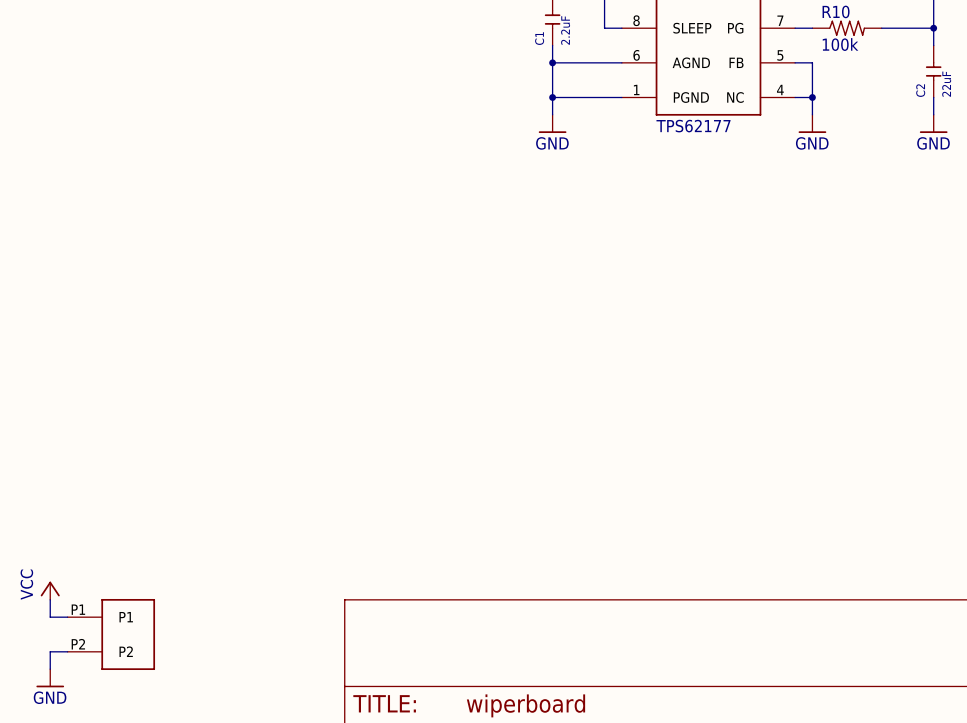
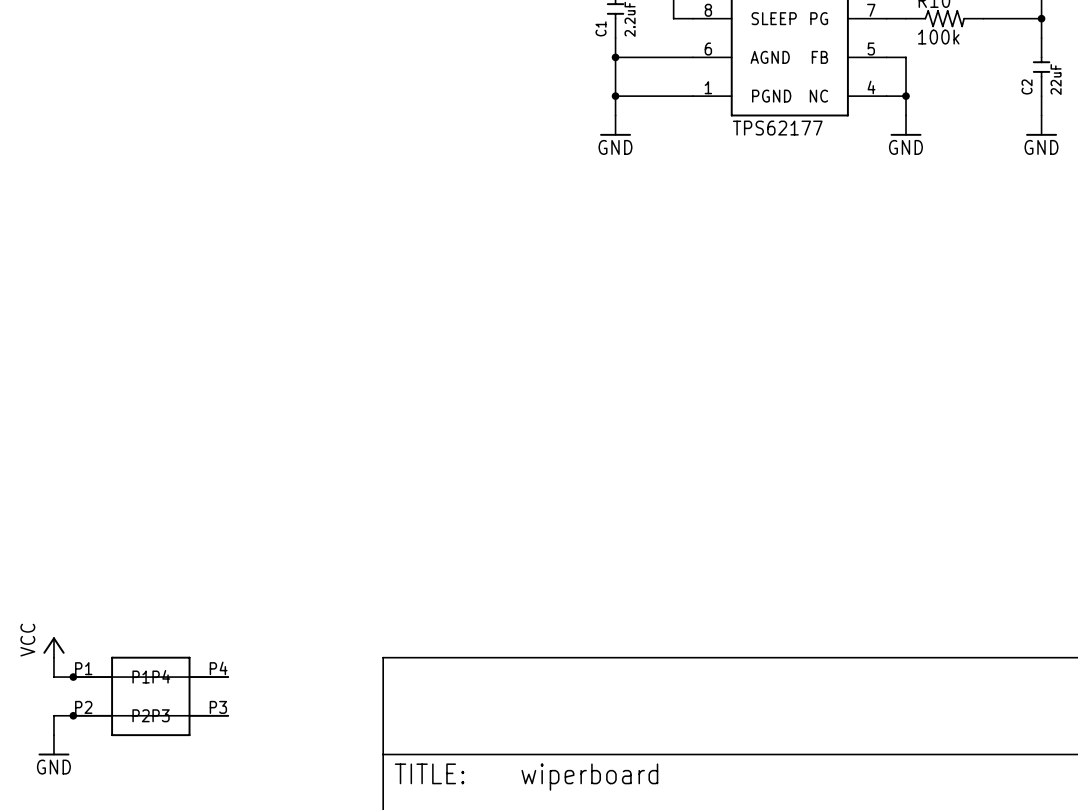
wire: none -> (73, 677) (228, 677)
junction: none -> (73, 677)
part: (111, 634) -> none
part: none -> (150, 696)
wire: none -> (73, 715) (228, 715)
junction: none -> (73, 715)

